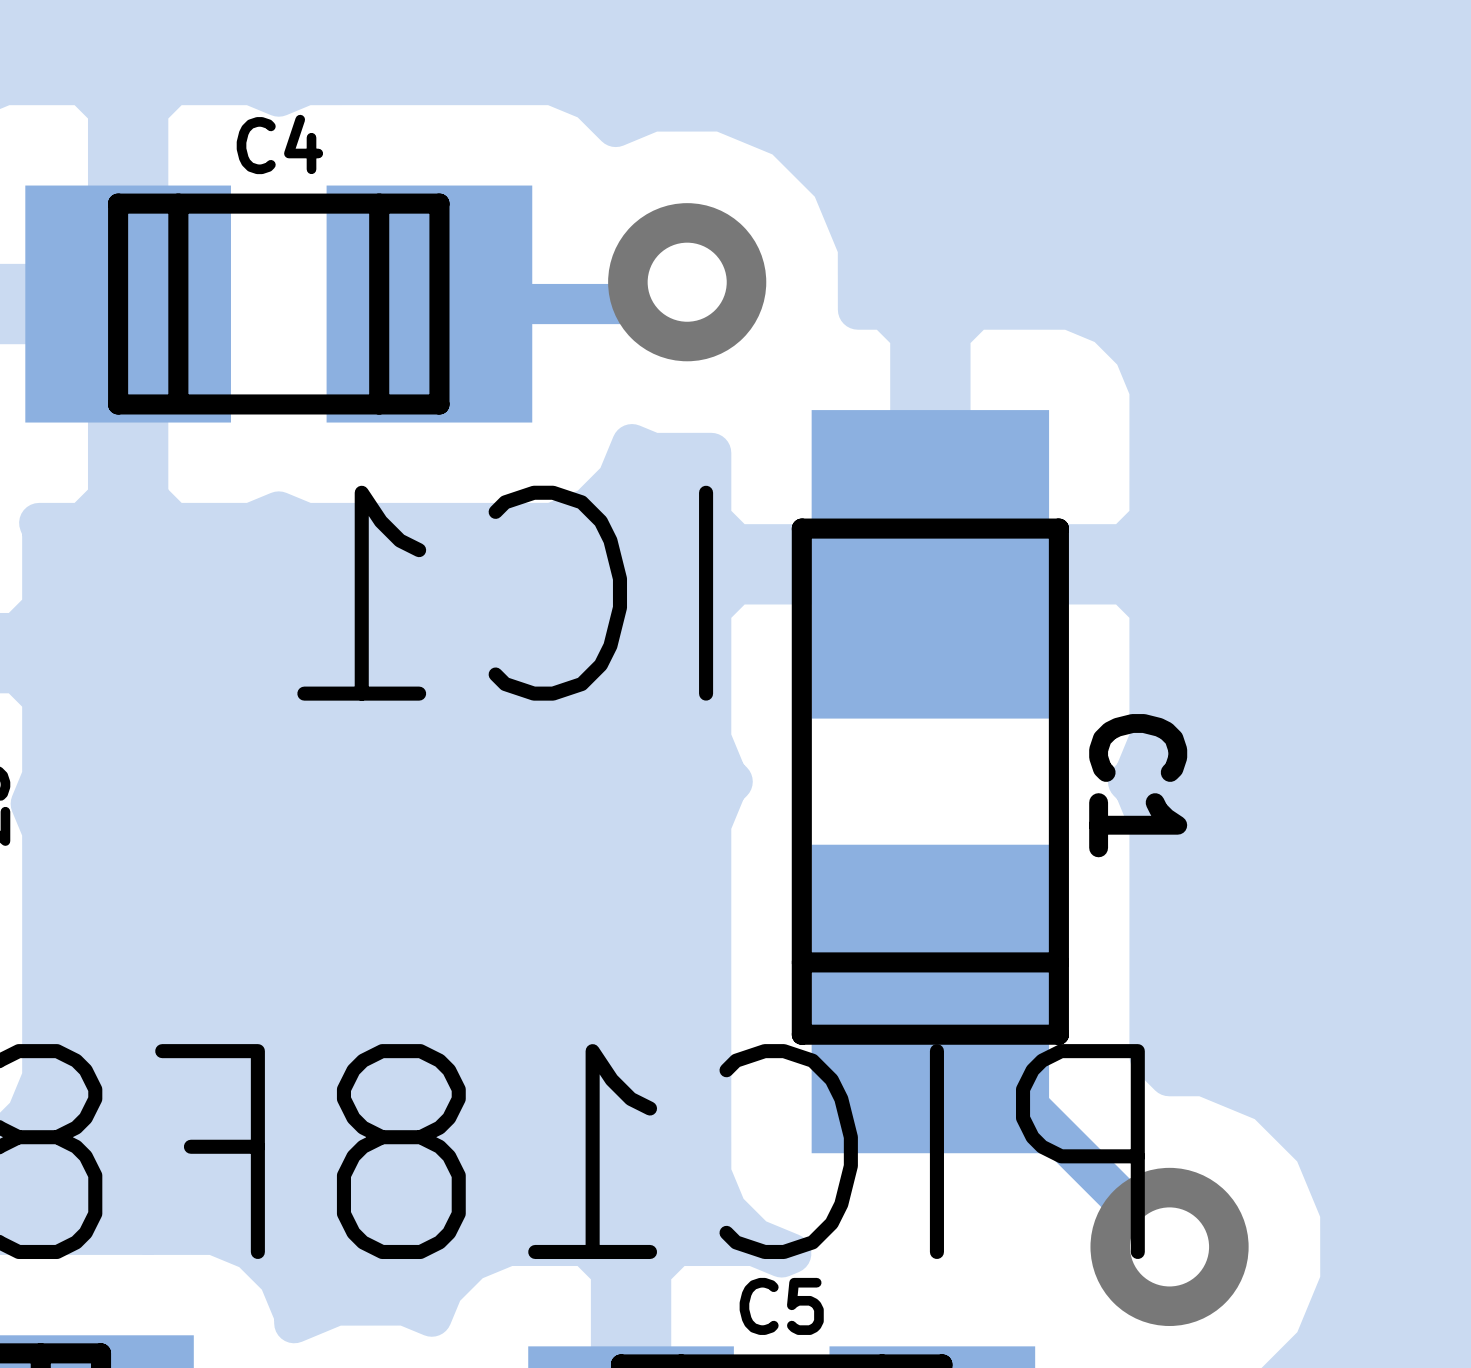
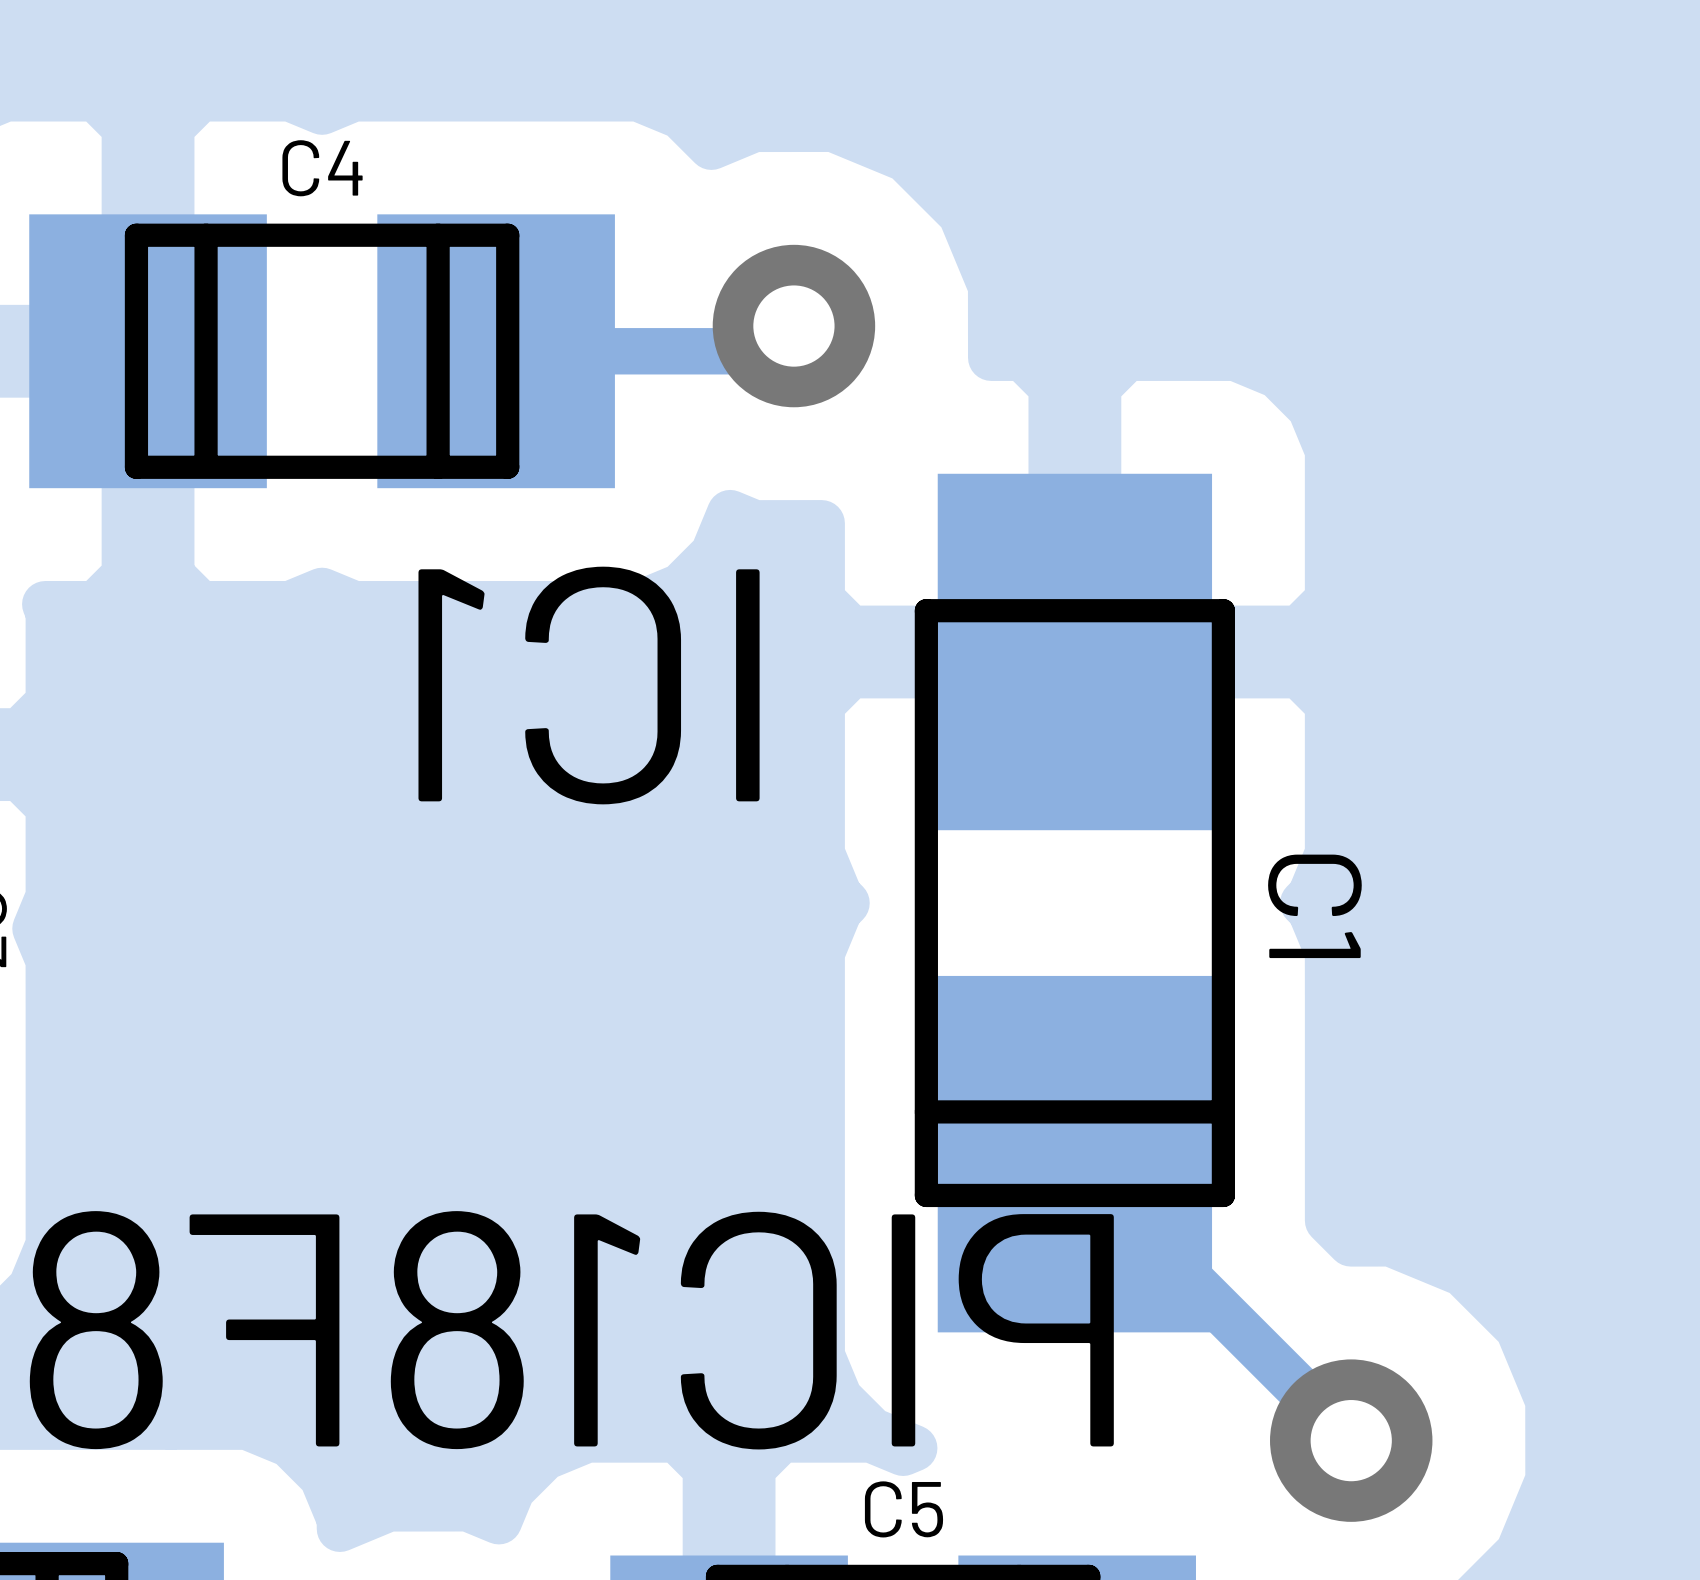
via size: [608, 203, 767, 362] -> [712, 244, 876, 408]
via size: [1090, 1167, 1249, 1327] -> [1270, 1359, 1433, 1522]

